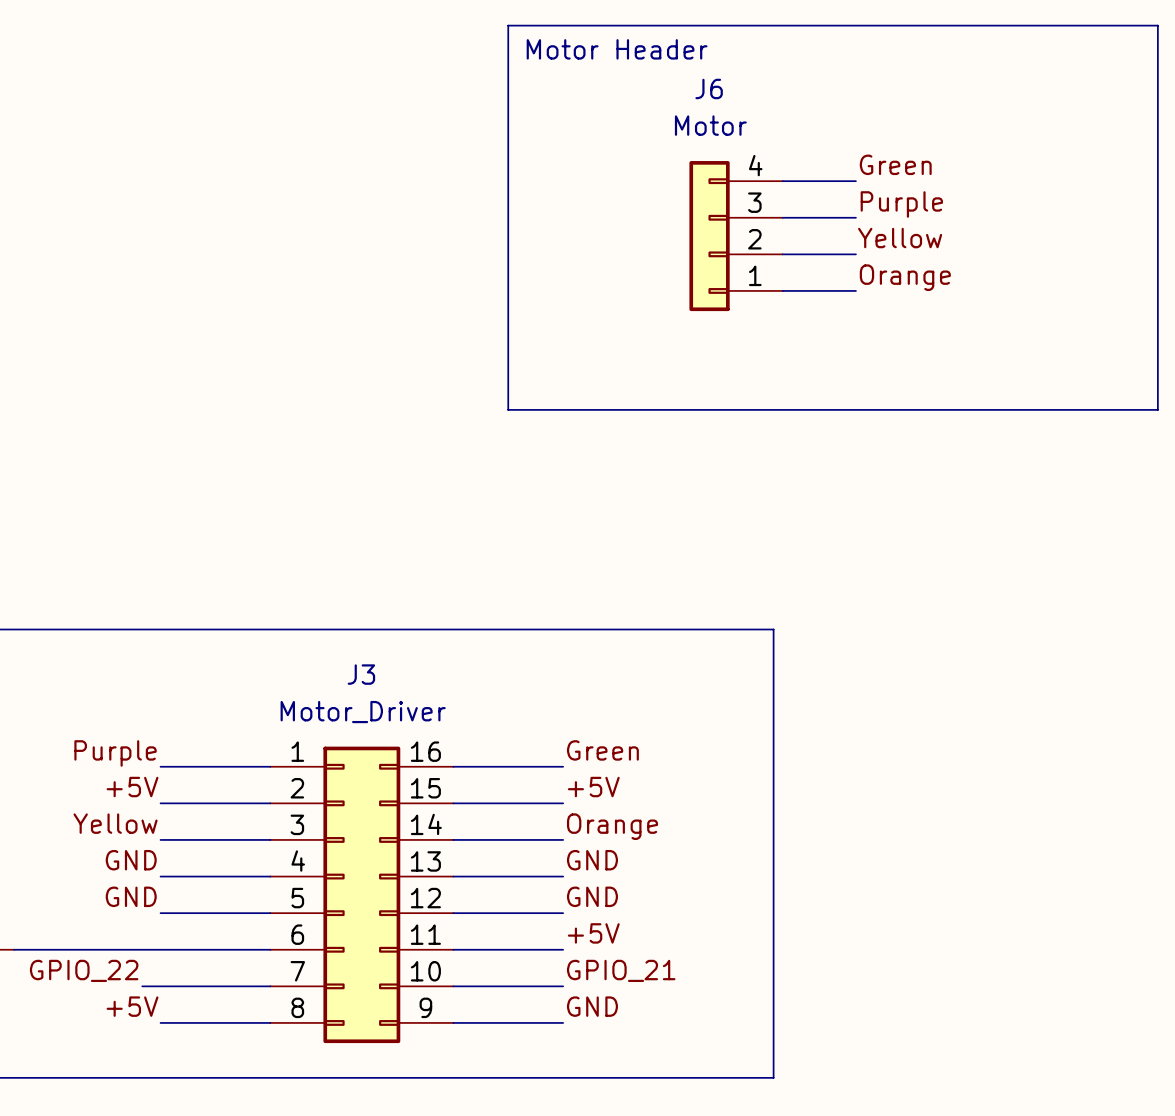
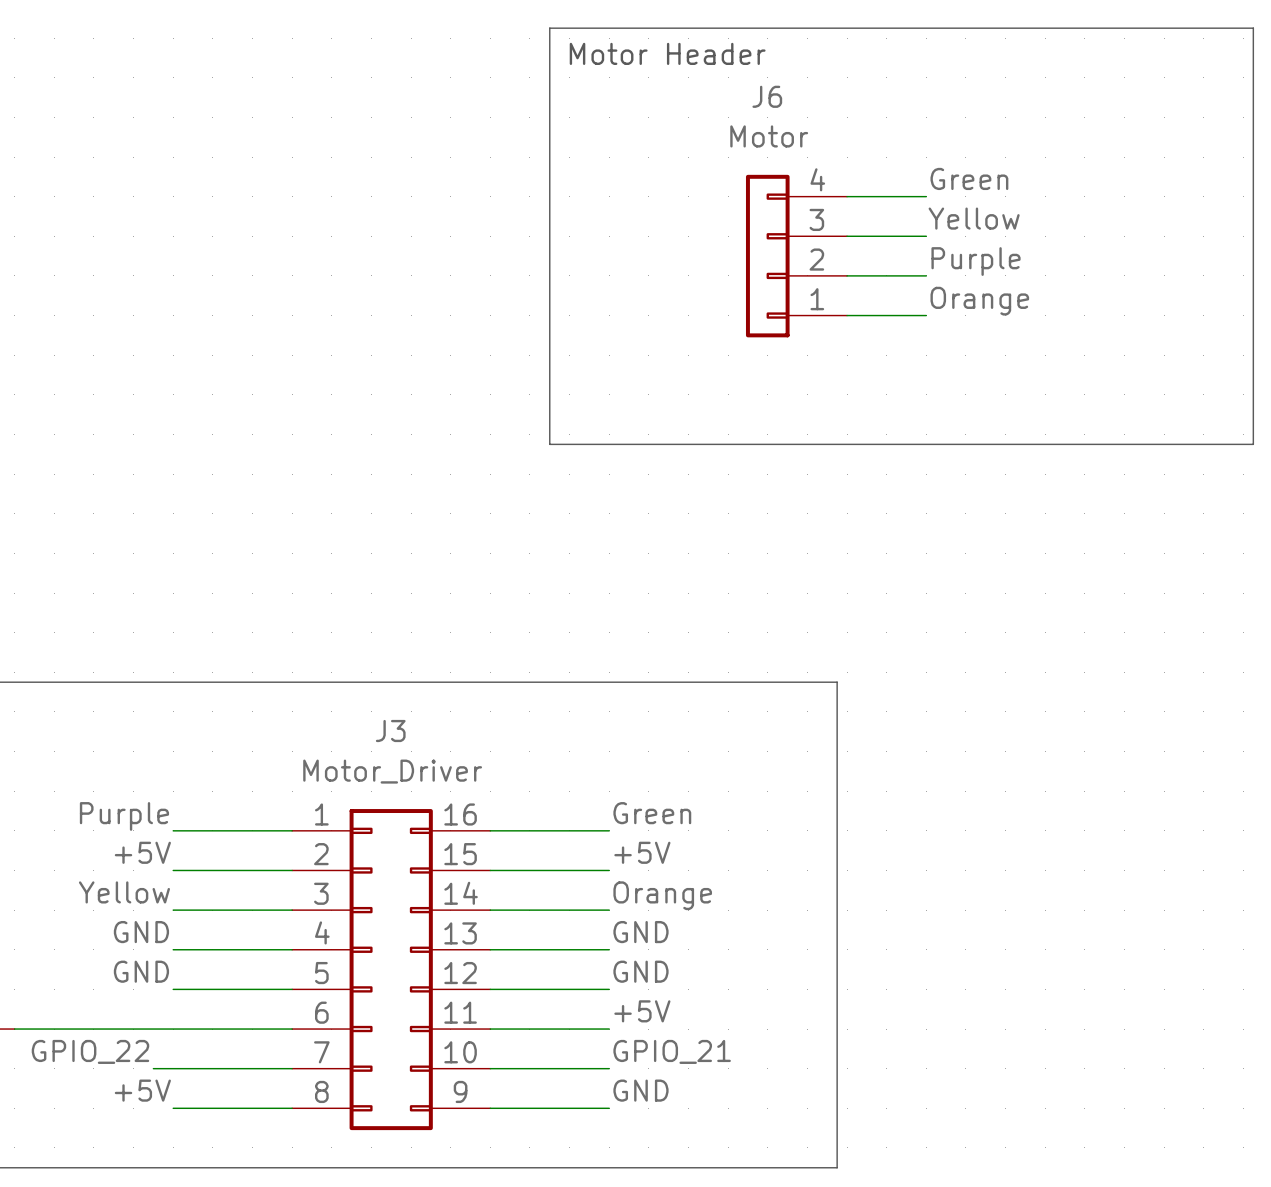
label: Purple (901, 204) -> Yellow (974, 218)
label: Yellow (900, 238) -> Purple (976, 261)

